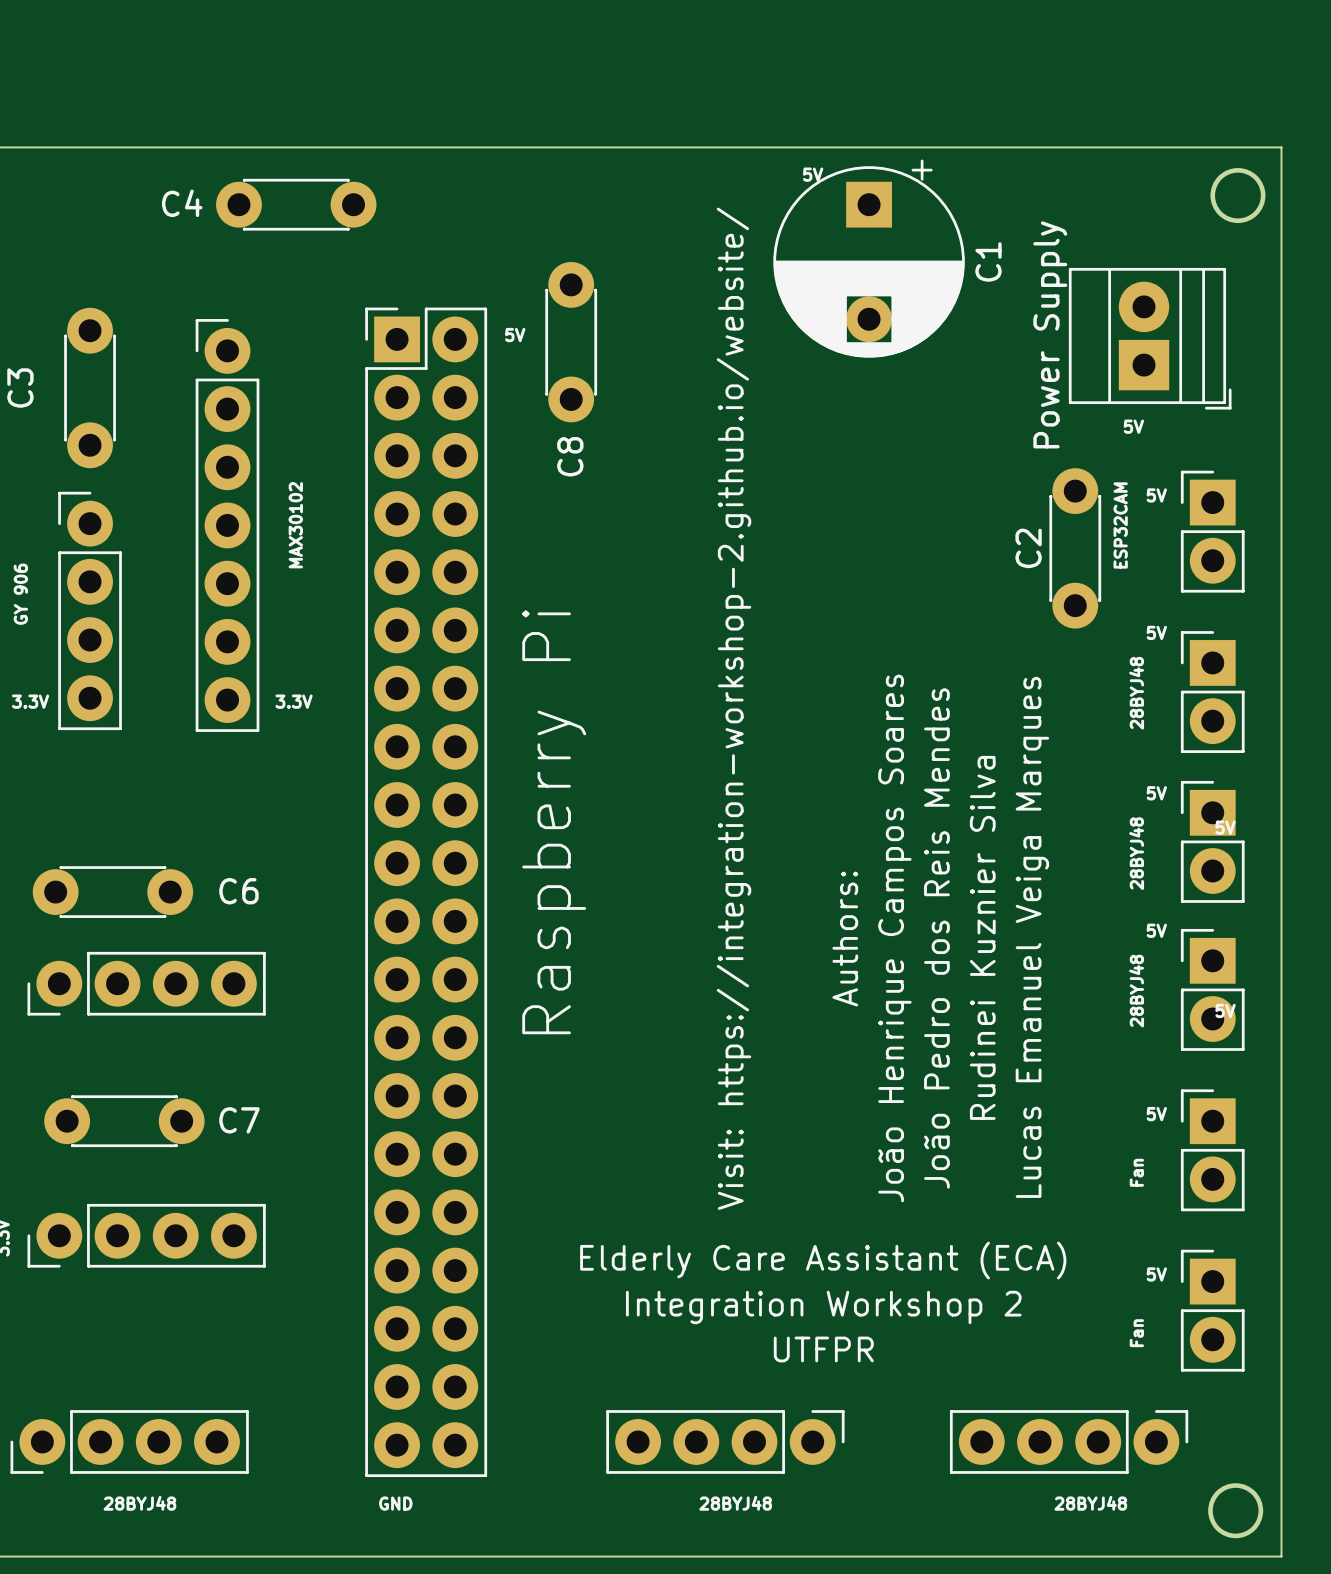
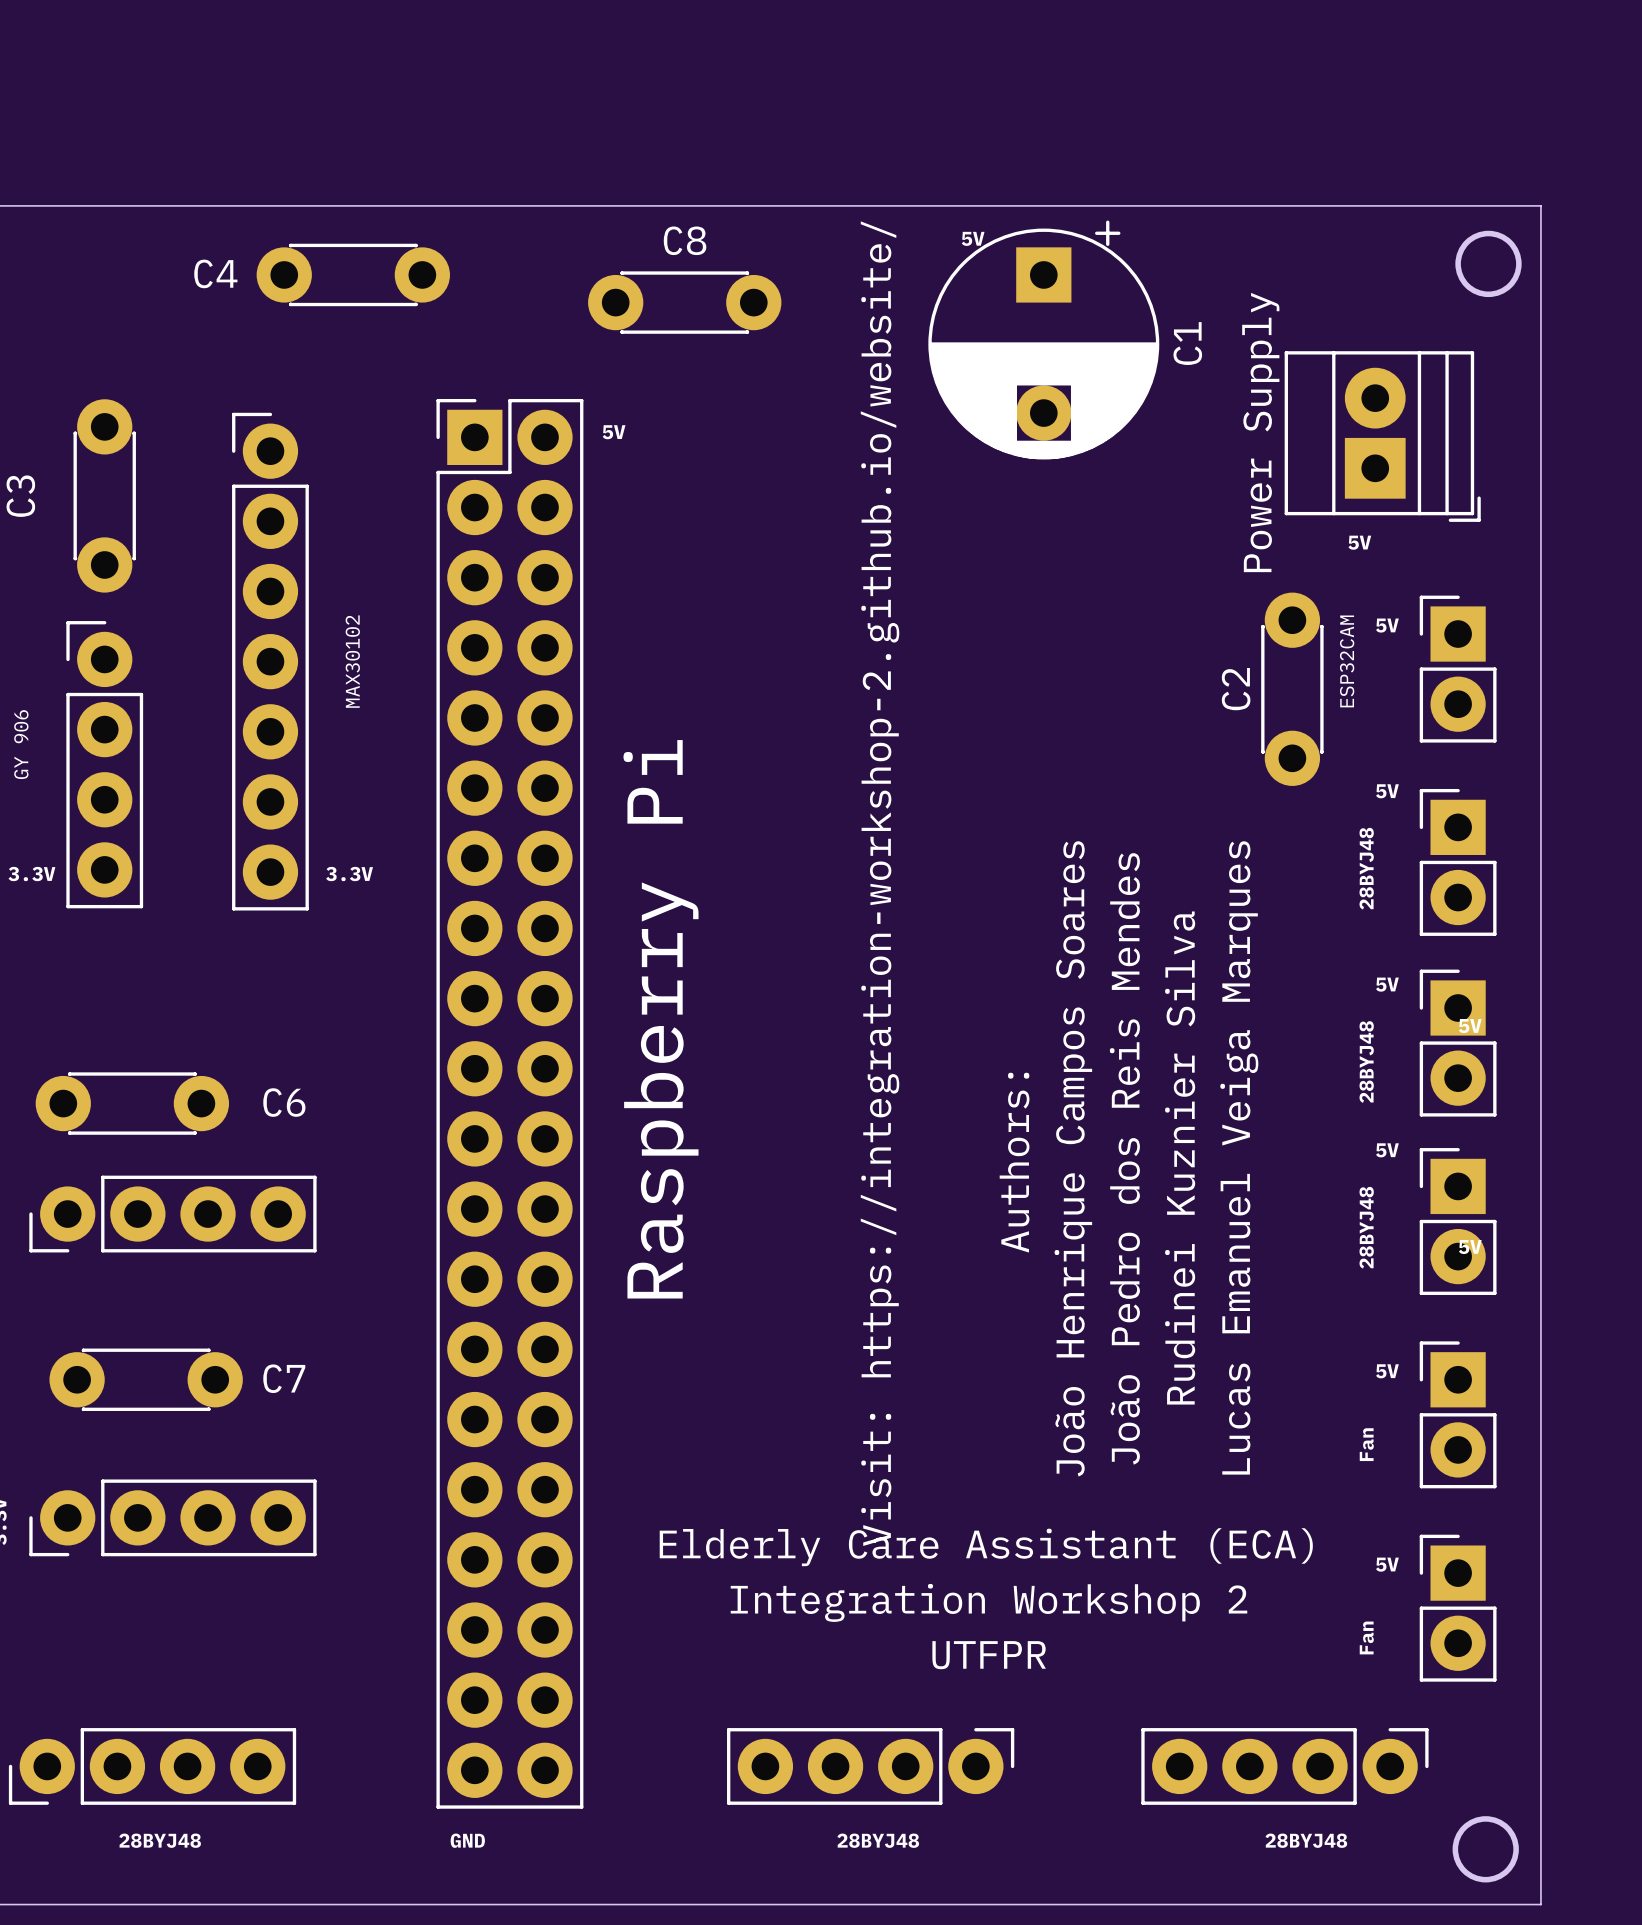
C8 rotation: 0° (571, 342) -> 90° clockwise (684, 302)
C8 position: (571, 342) -> (684, 302)
C8 name position: C8 (570, 456) -> C8 (685, 240)

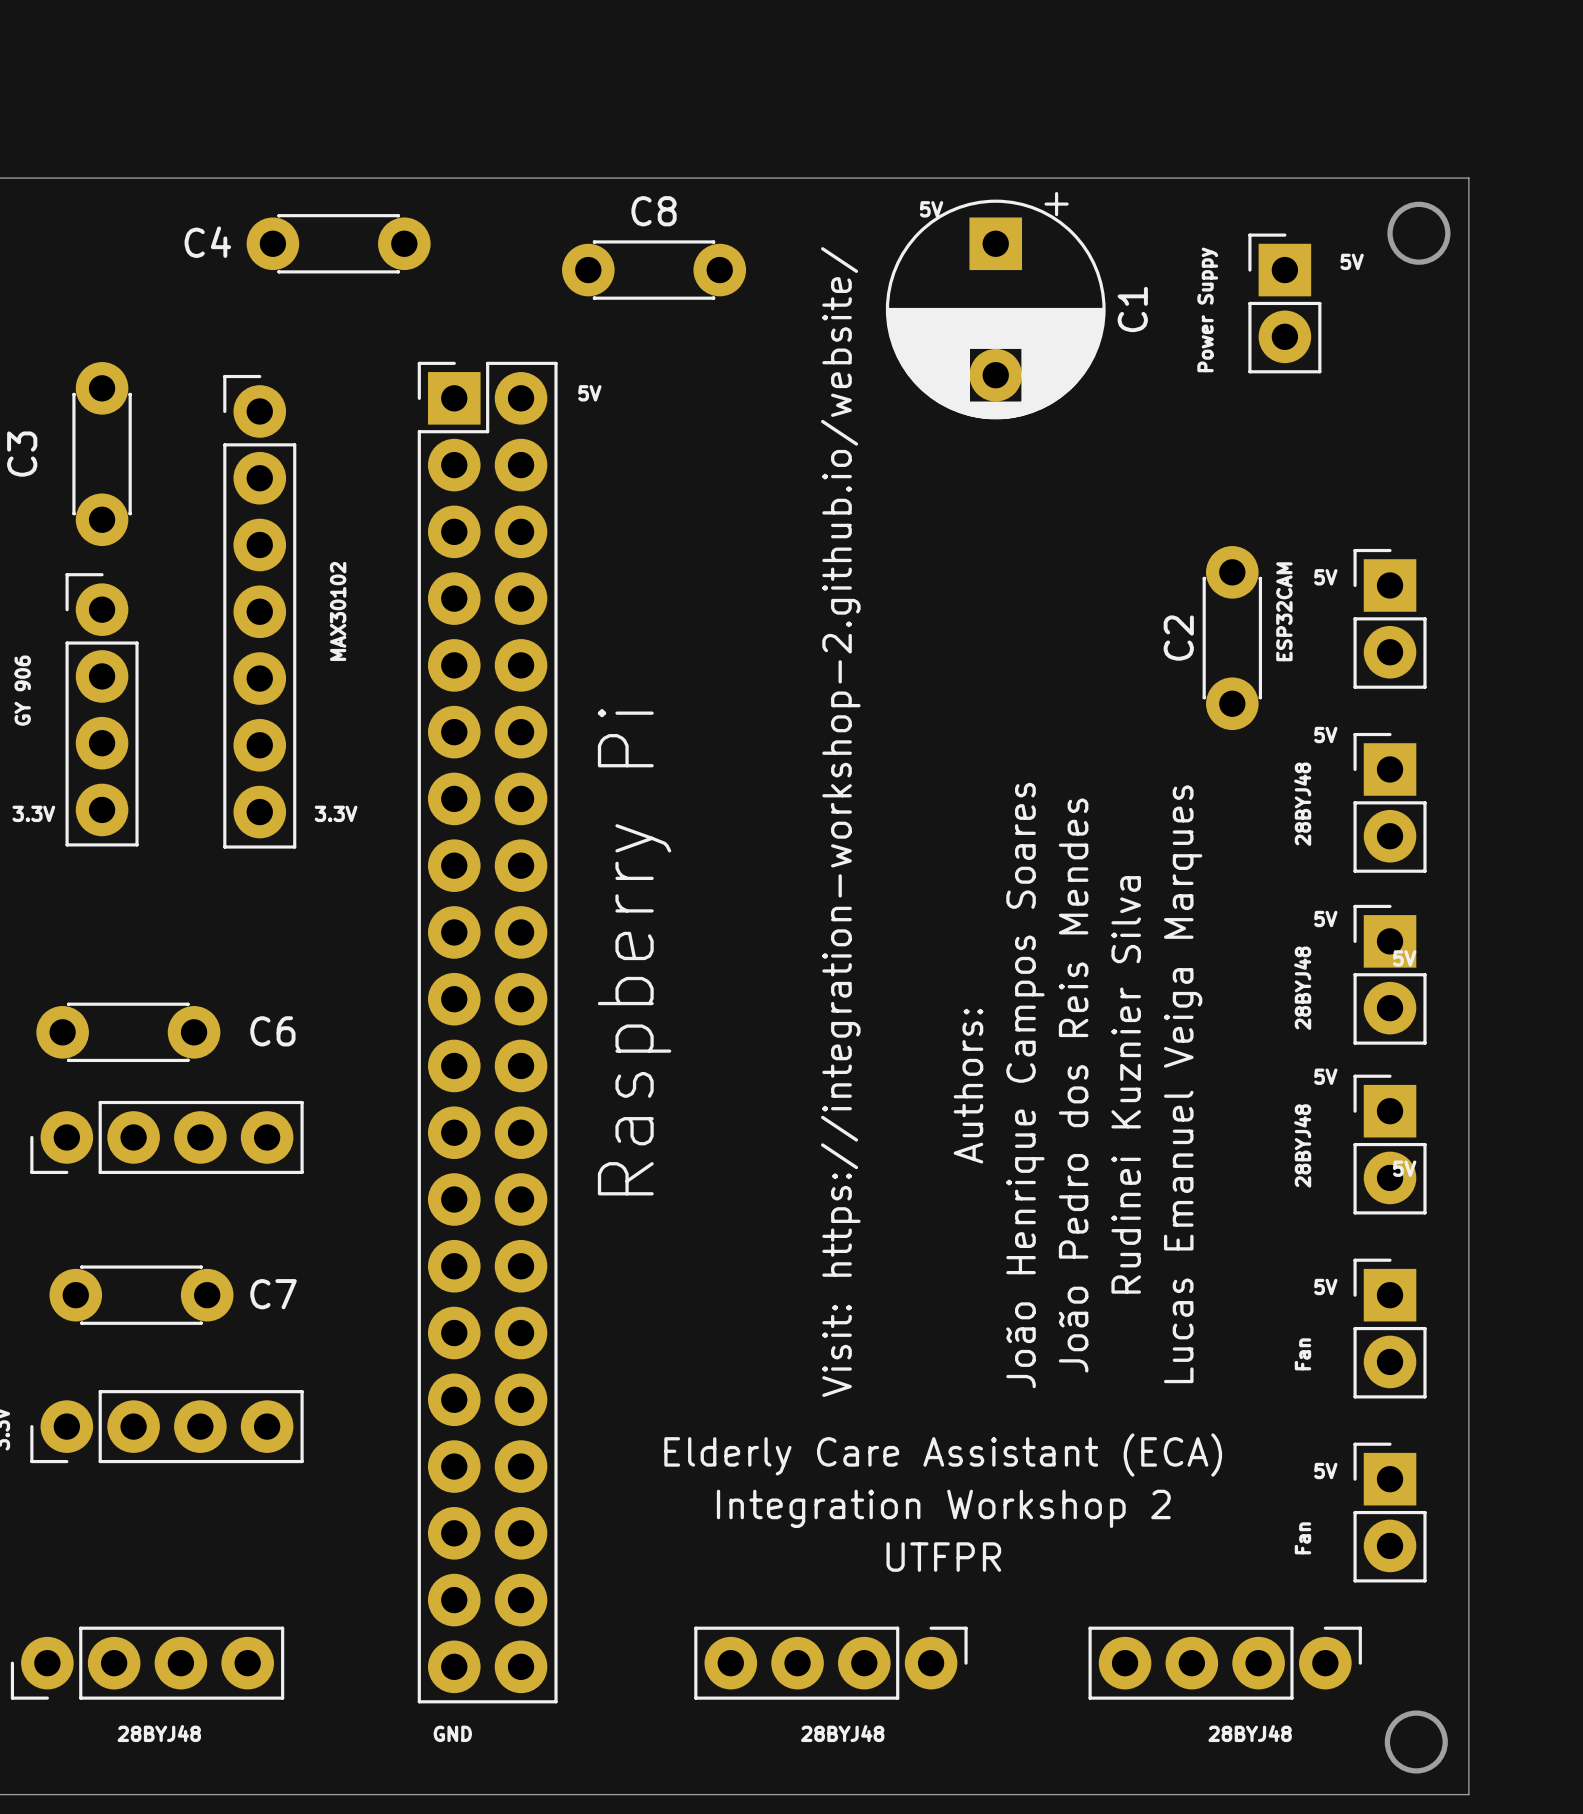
Power Suppy: none -> (1284, 303)
Power Supply: (1382, 436) -> none
text position: 5V (1359, 542) -> 5V (1352, 261)

